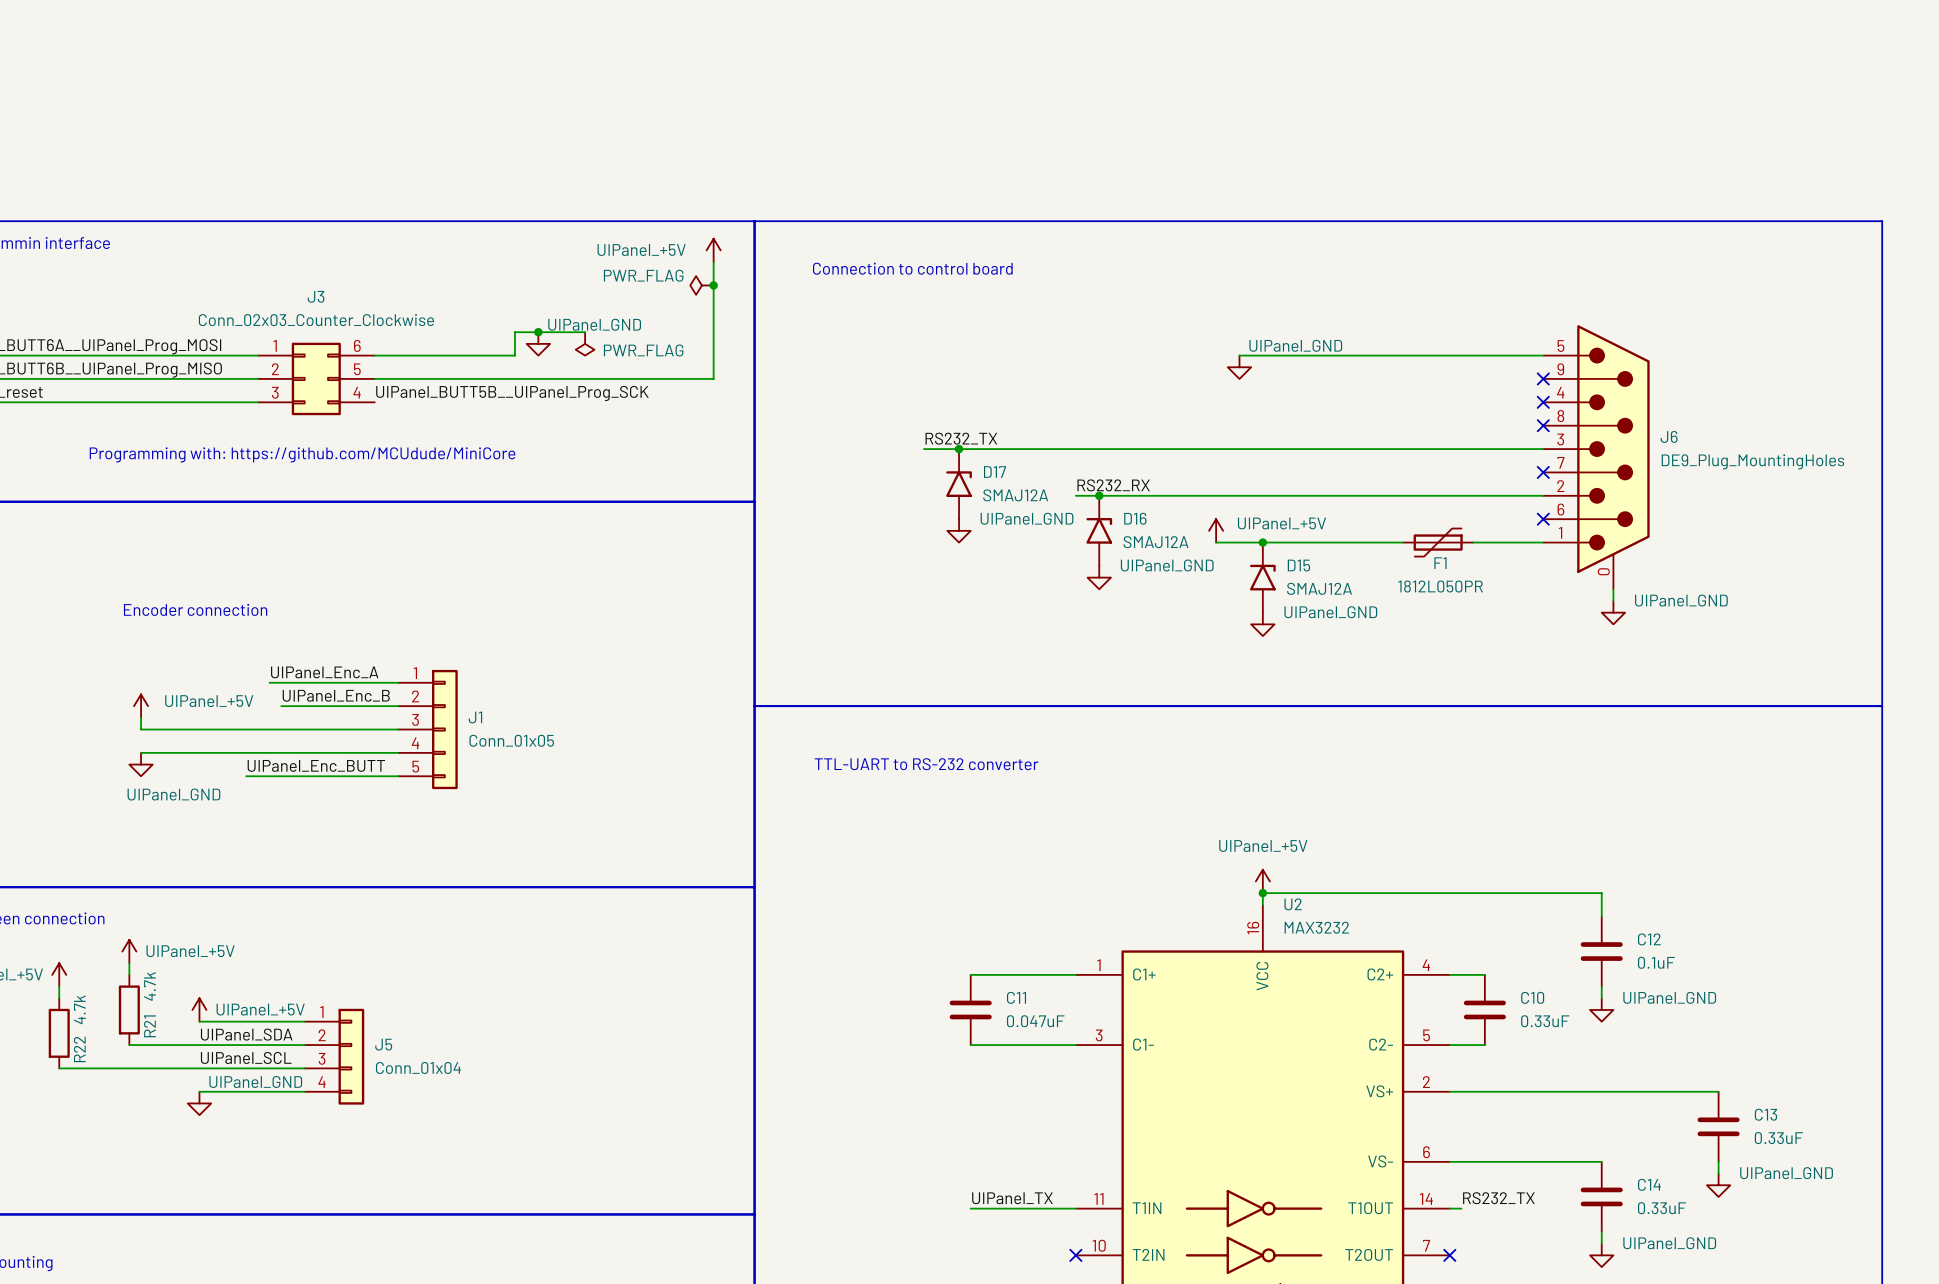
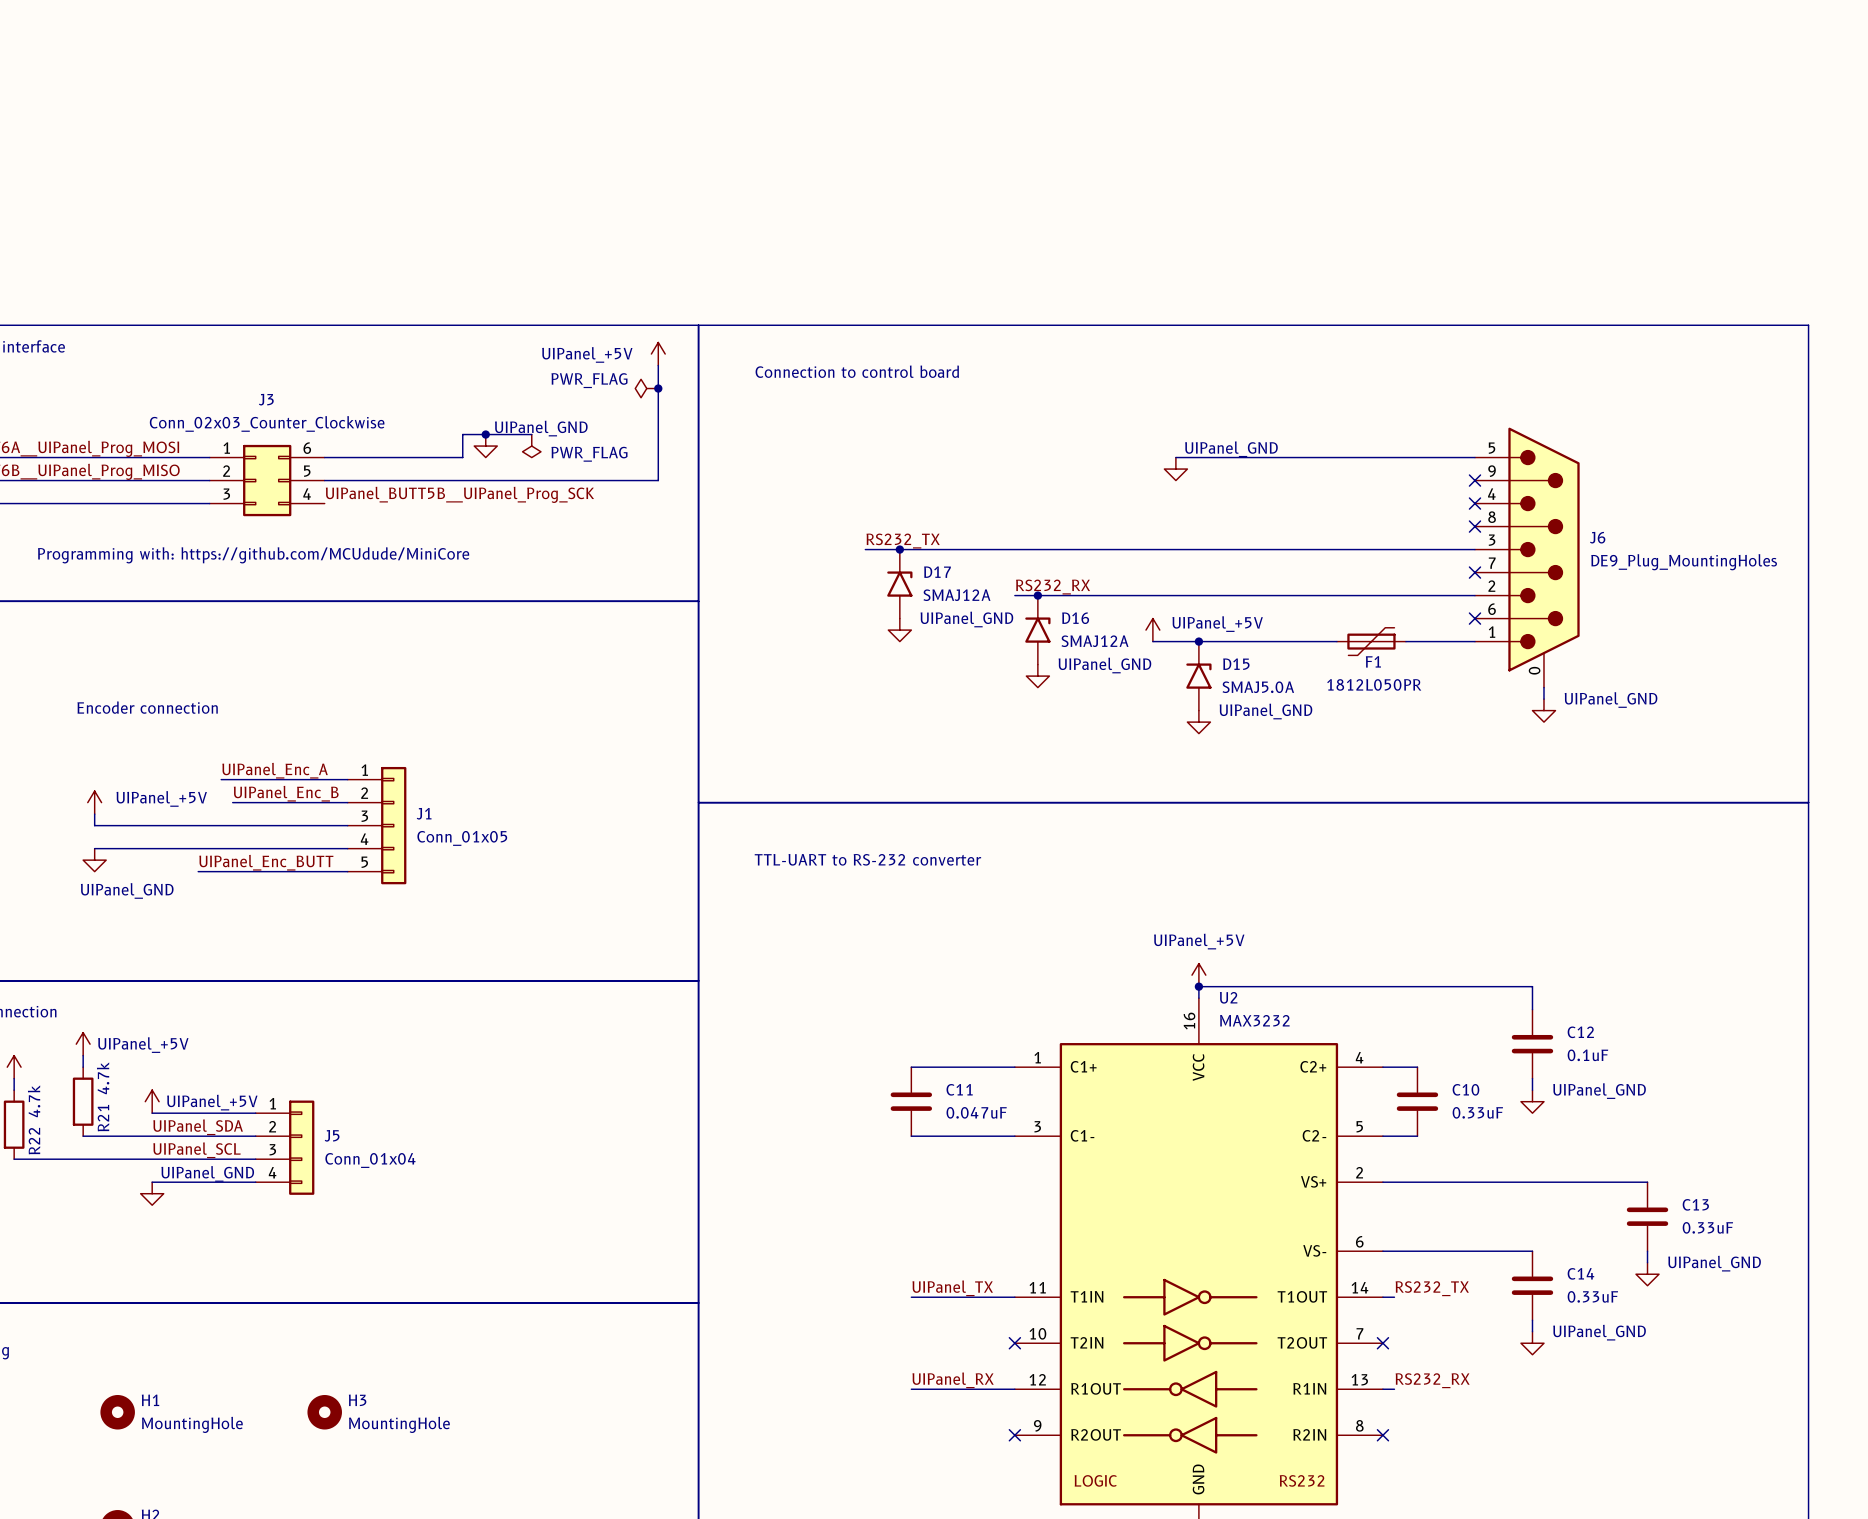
D15 value: SMAJ12A (1319, 588) -> SMAJ5.0A (1258, 687)

